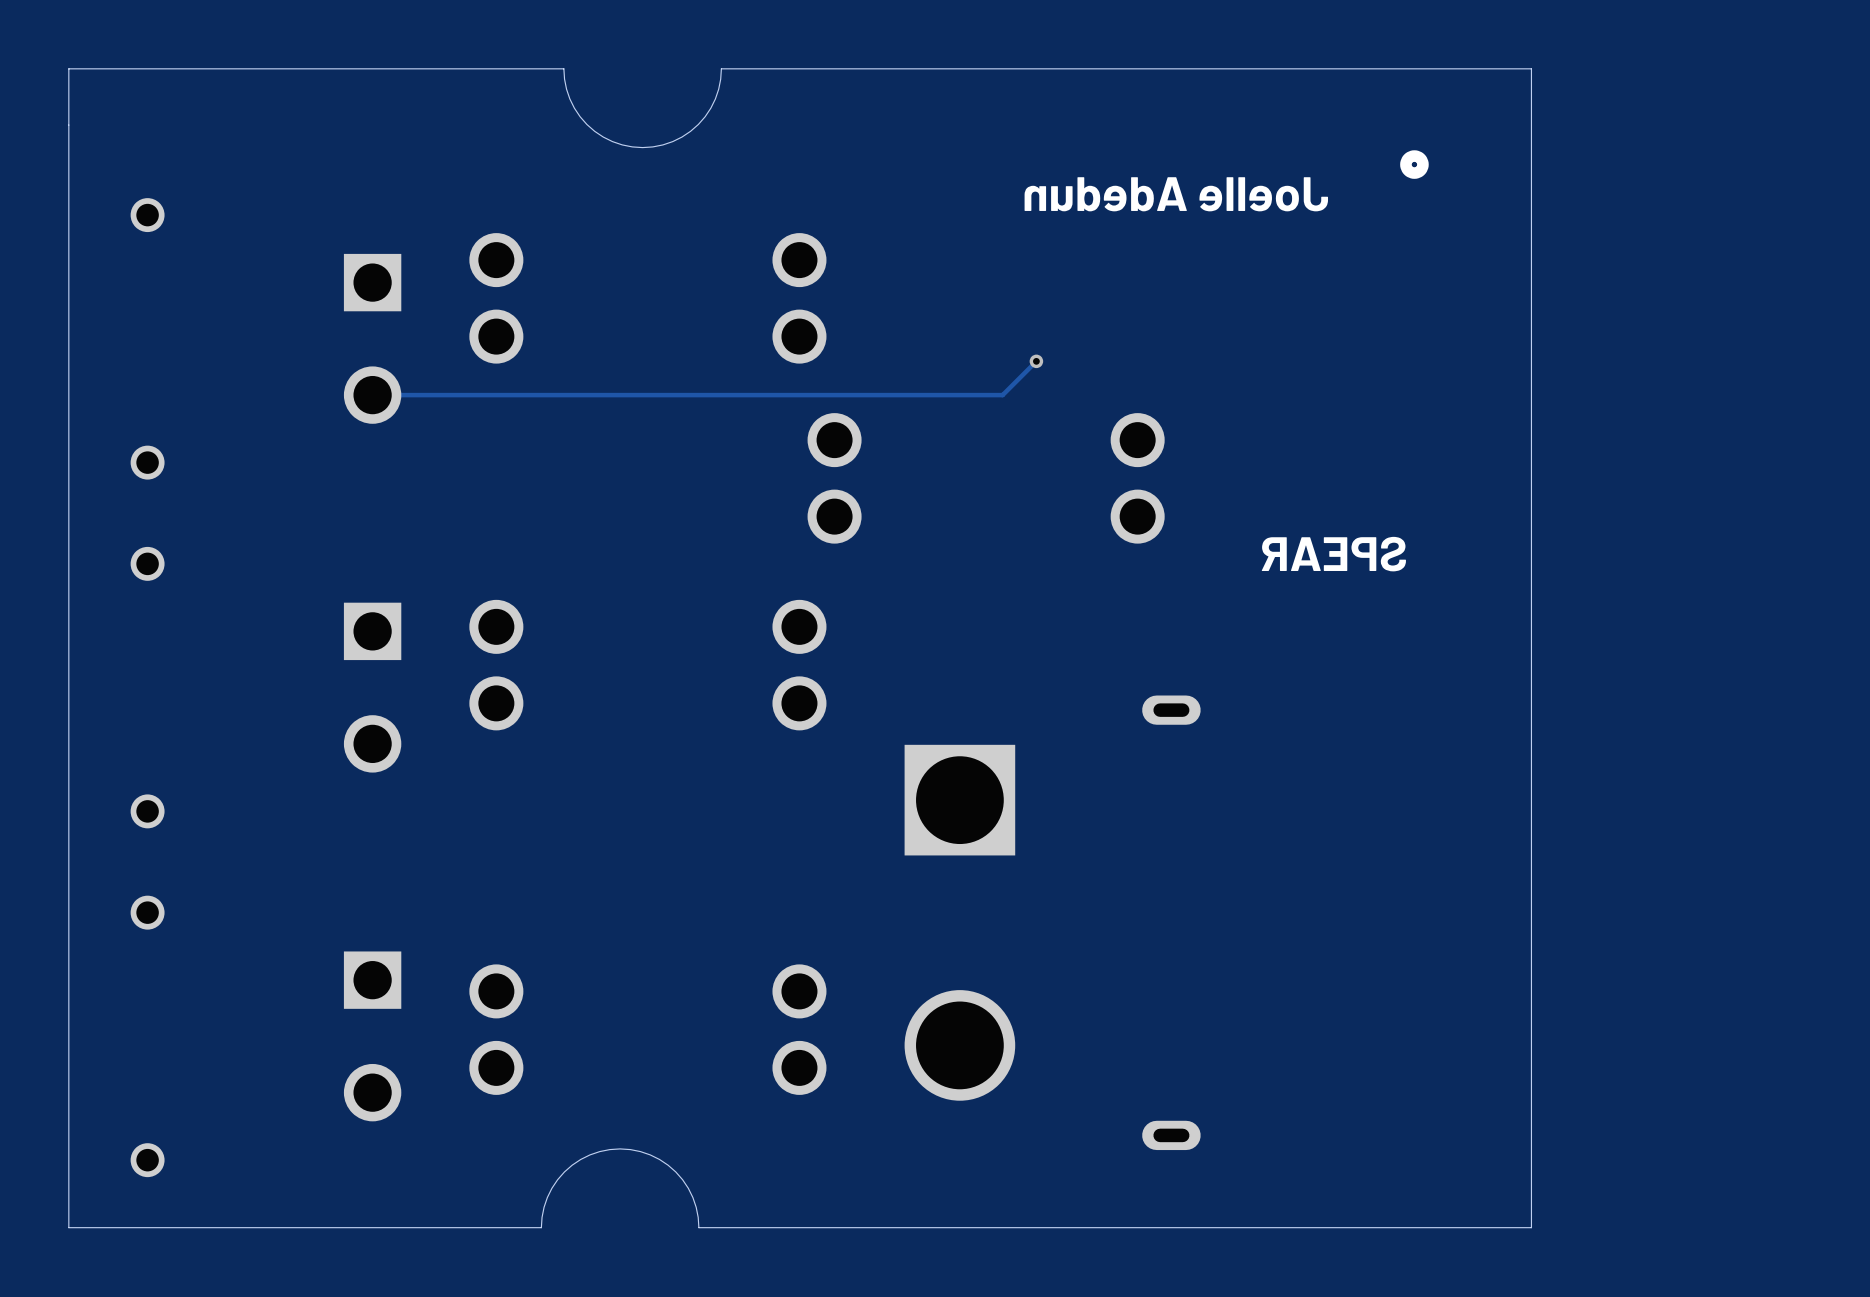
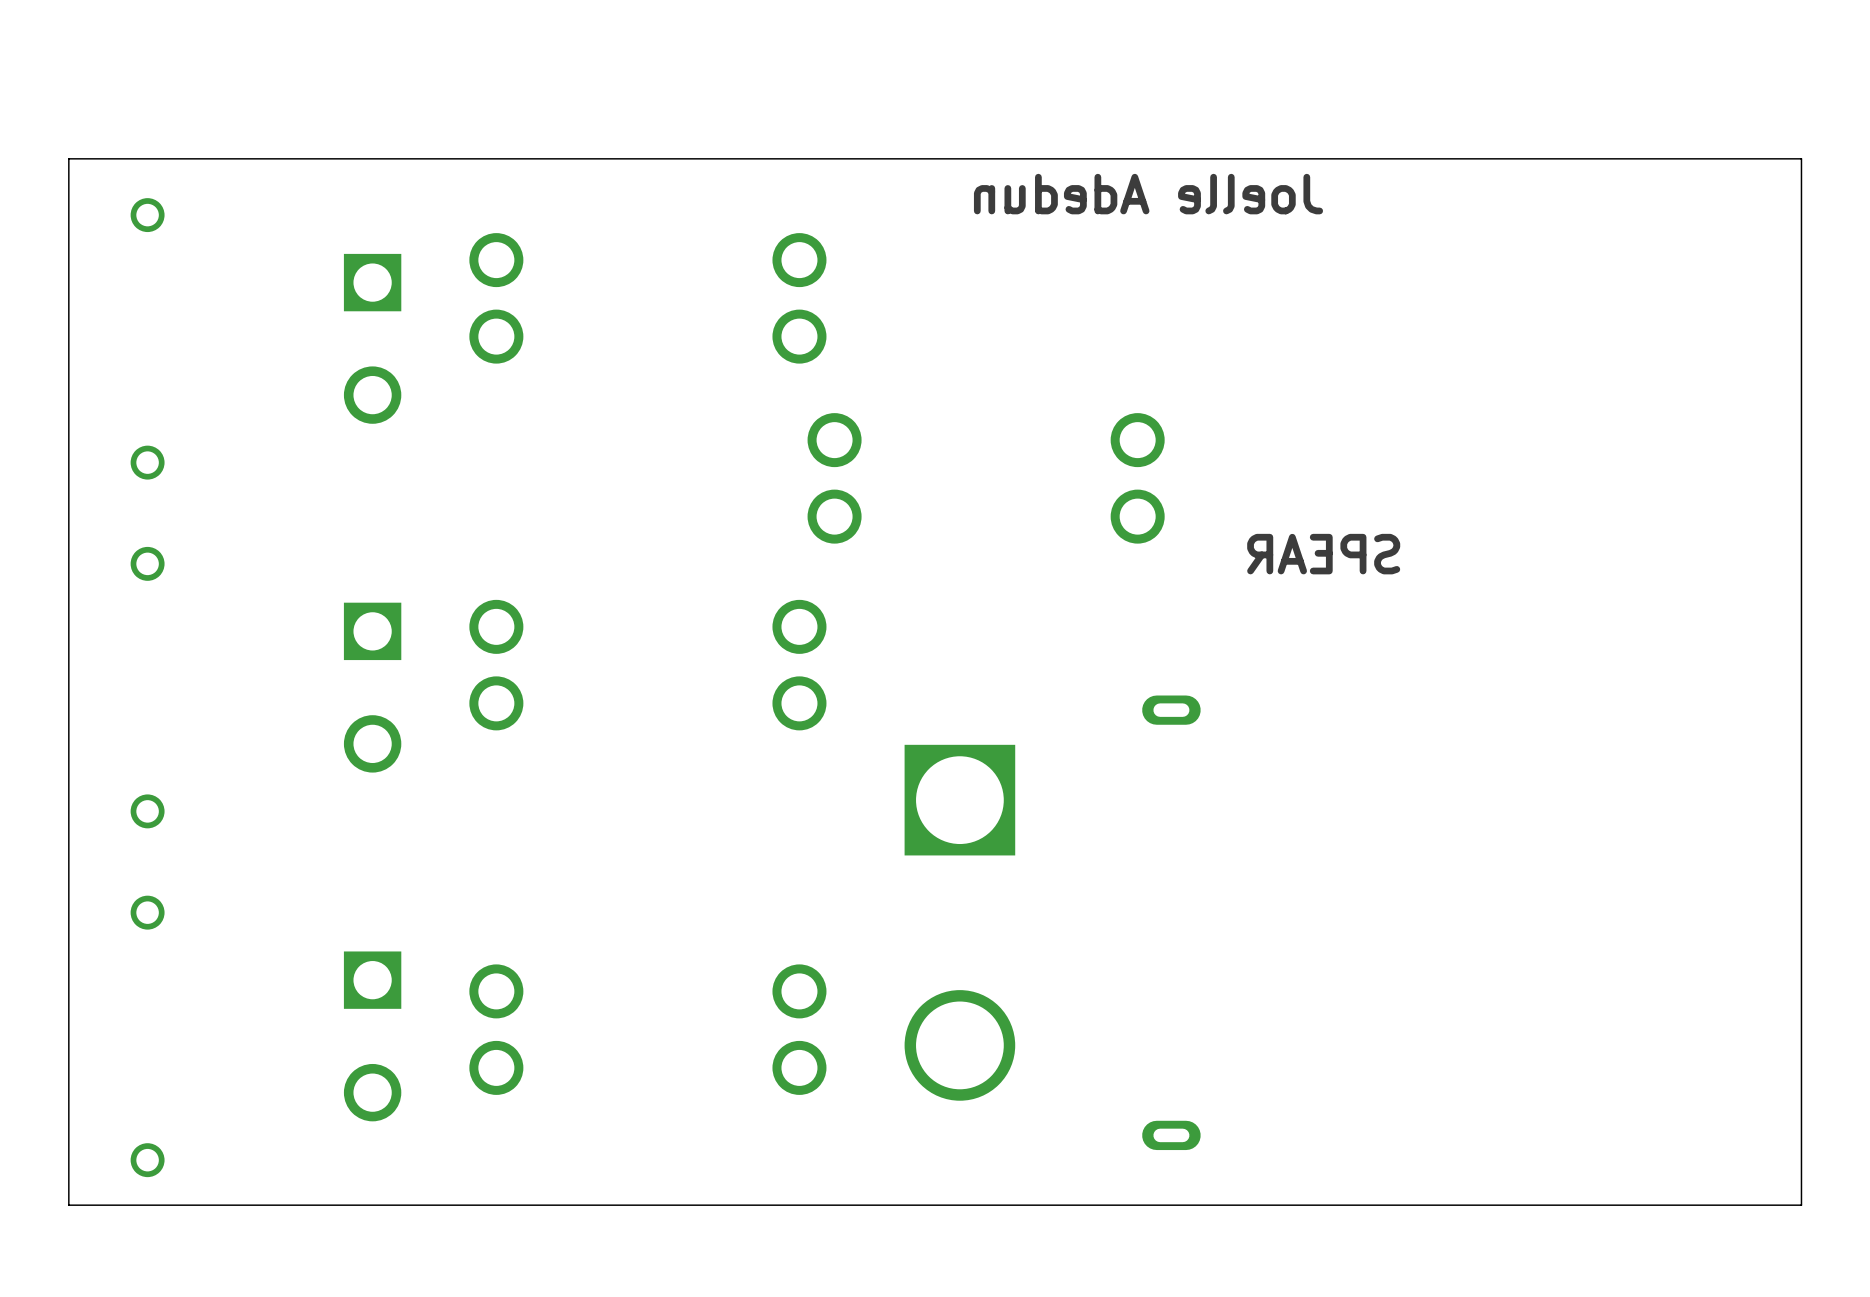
board edge: (68, 158) (68, 68) (563, 68) (569, 98) (586, 124) (612, 141) (642, 147) (672, 141) (698, 124) (715, 98) (721, 68) (1531, 68) (1531, 1227) (698, 1227) (692, 1197) (675, 1171) (650, 1154) (620, 1148) (589, 1154) (564, 1171) (547, 1197) (541, 1227) (68, 1227) (68, 1205) -> (68, 158) (1801, 158) (1801, 1205) (68, 1205)
part: (1414, 164) -> none
track: (1036, 361) (1002, 395) (372, 395) -> none
via: (1036, 361) -> none

